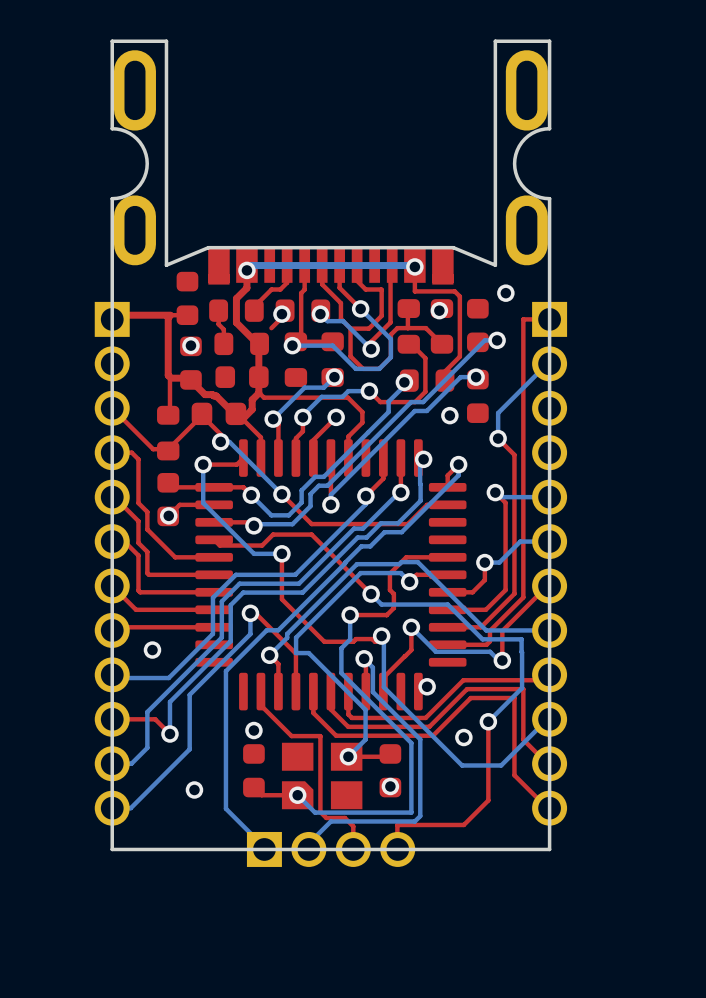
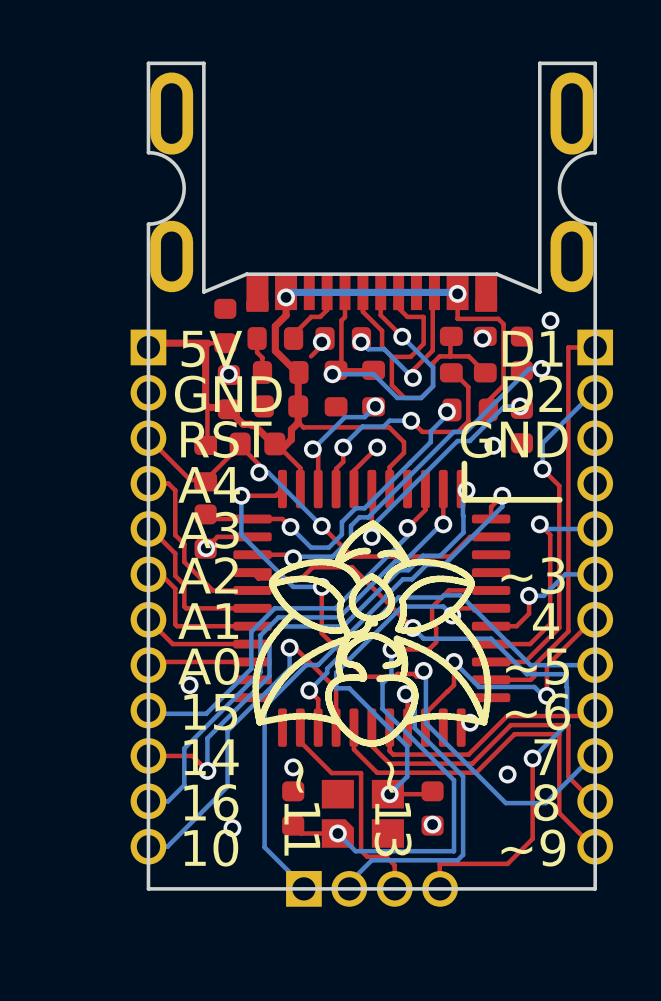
text: none -> 5V (211, 349)
text: none -> D1 (532, 348)
text: none -> D2 (532, 393)
text: none -> GND (228, 394)
text: none -> RST (226, 439)
text: none -> GND (514, 439)
line: none -> (464, 463) (464, 499) (559, 499)
text: none -> A4 (209, 484)
text: none -> A3 (208, 530)
line: none -> (367, 551) (353, 553) (336, 563) (349, 541) (373, 523) (393, 541) (407, 563) (394, 553) (380, 555)
text: none -> A2 (207, 575)
text: none -> ~3 (533, 575)
line: none -> (371, 576) (357, 587) (352, 601) (353, 608) (357, 613) (371, 618) (386, 613) (390, 608) (391, 601) (386, 587) (371, 576)
line: none -> (358, 581) (352, 572) (344, 566) (320, 562) (301, 564) (288, 568) (276, 576) (272, 584)
line: none -> (385, 581) (391, 572) (399, 566) (423, 562) (441, 564) (455, 568) (467, 576) (471, 584)
line: none -> (272, 584) (305, 578) (316, 580) (326, 585) (341, 600) (340, 613) (345, 629) (333, 630) (320, 628) (293, 613)
line: none -> (272, 584) (280, 599) (293, 613)
line: none -> (471, 584) (438, 578) (427, 580) (417, 585) (402, 600) (403, 613) (398, 629) (410, 630) (423, 628) (450, 613)
line: none -> (471, 584) (463, 599) (450, 613)
line: none -> (293, 613) (270, 639) (259, 663) (255, 690) (259, 722)
line: none -> (450, 613) (472, 639) (484, 663) (487, 690) (484, 722)
text: none -> A1 (208, 621)
text: none -> 4 (545, 621)
line: none -> (375, 623) (368, 623) (366, 628) (361, 632) (347, 635)
line: none -> (356, 665) (344, 661) (345, 652) (356, 640) (371, 635) (387, 640) (399, 653) (400, 659) (398, 662) (385, 666)
text: none -> A0 (208, 666)
text: none -> ~5 (537, 666)
line: none -> (361, 670) (363, 674)
line: none -> (341, 678) (339, 659) (346, 638) (314, 653) (290, 670) (273, 692) (259, 722)
line: none -> (341, 678) (363, 678)
line: none -> (341, 678) (332, 683) (328, 693) (330, 706) (338, 722)
line: none -> (401, 678) (410, 683) (415, 693) (413, 706) (405, 722)
line: none -> (401, 678) (404, 659) (396, 638) (429, 653) (453, 670) (470, 692) (484, 722)
line: none -> (401, 678) (379, 679)
text: none -> 15 (210, 712)
text: none -> ~6 (538, 711)
line: none -> (338, 722) (304, 716) (259, 722)
line: none -> (405, 722) (439, 716) (484, 722)
line: none -> (405, 722) (388, 738) (372, 743) (363, 742) (355, 738) (338, 722)
text: none -> 14 (211, 757)
text: none -> 7 (546, 757)
text: none -> 16 (211, 802)
text: none -> 8 (546, 802)
text: none -> ~11 (302, 808)
text: none -> ~13 (393, 809)
text: none -> 10 (211, 848)
text: none -> ~9 (533, 848)

